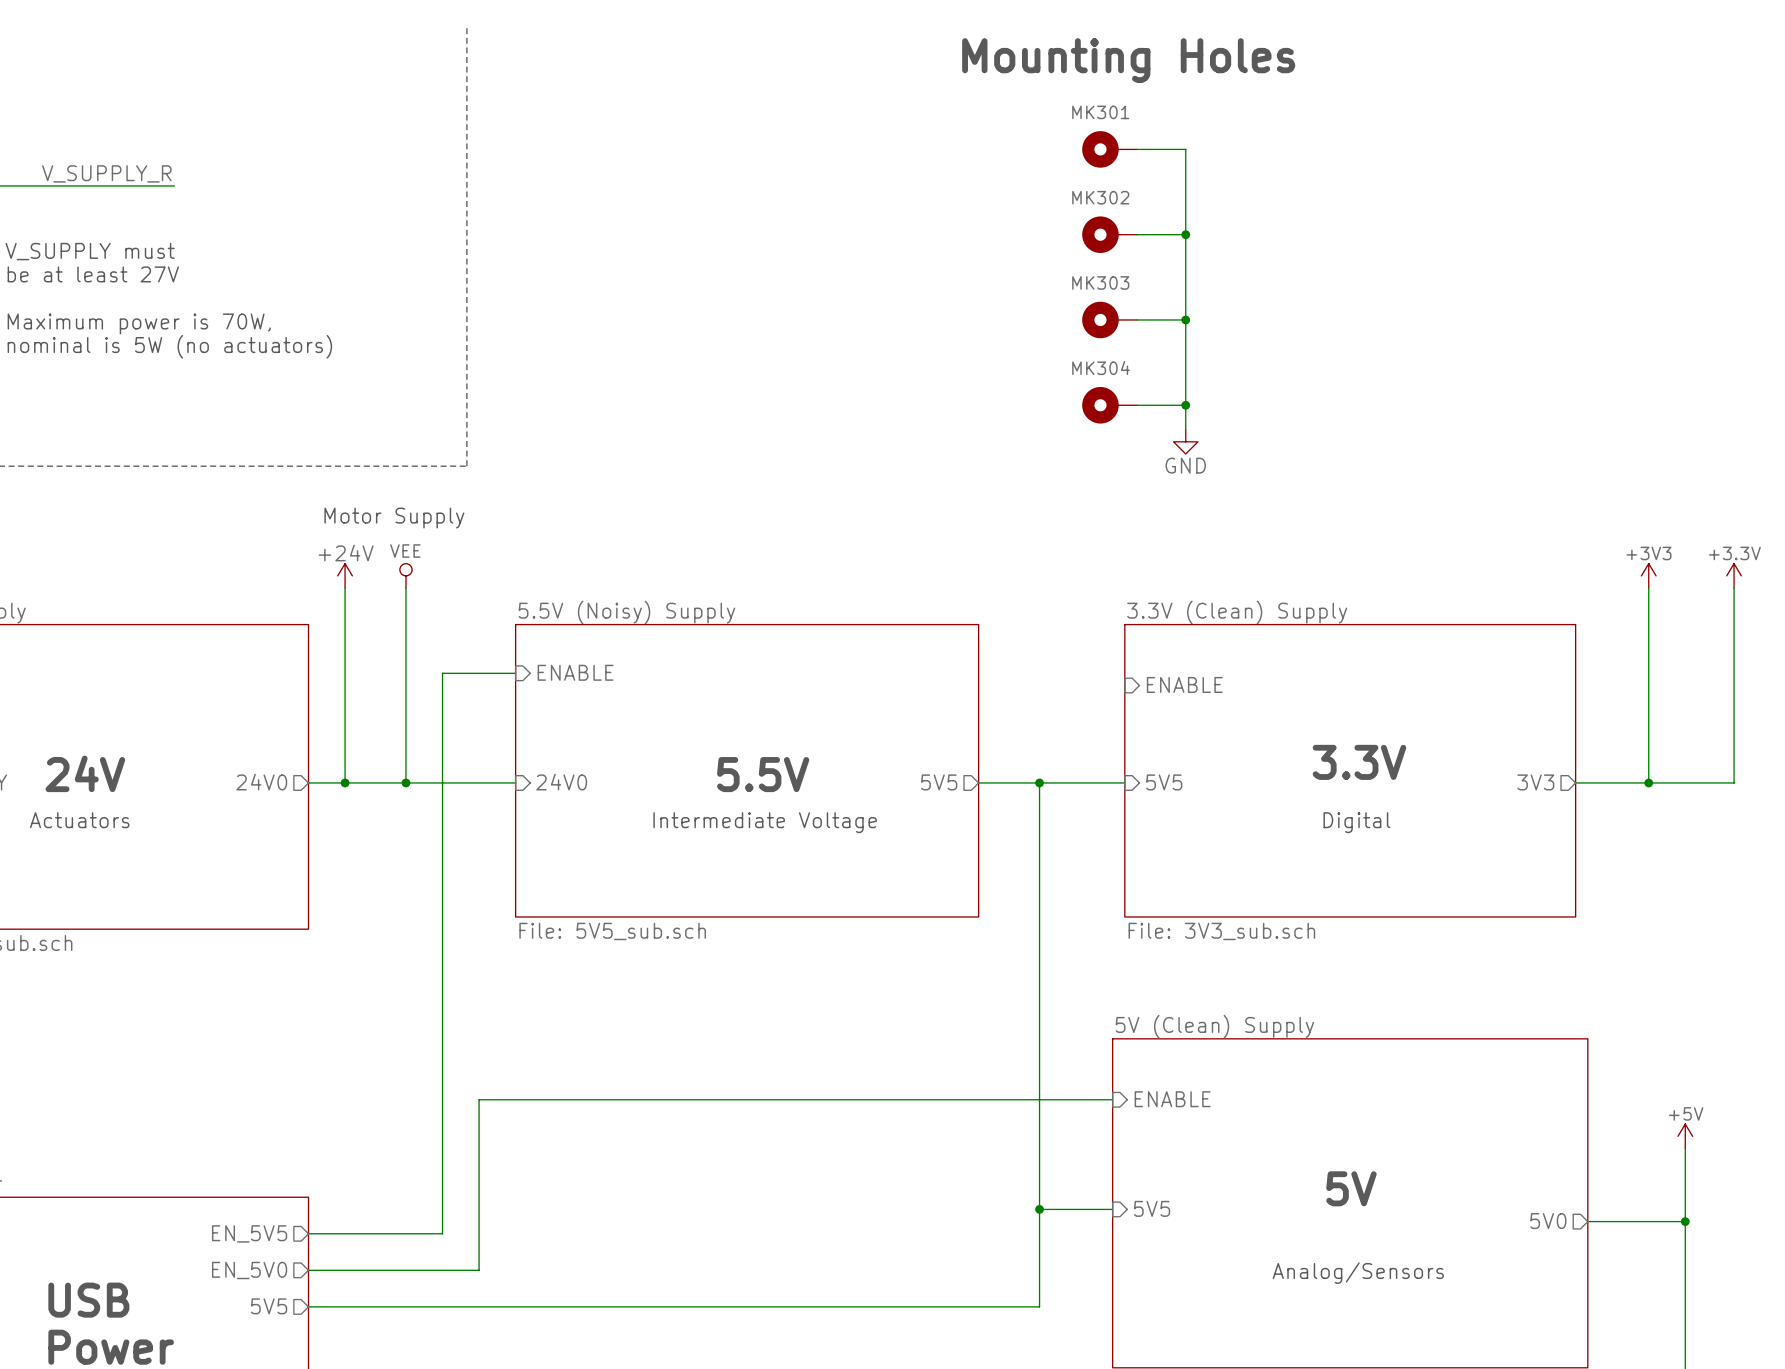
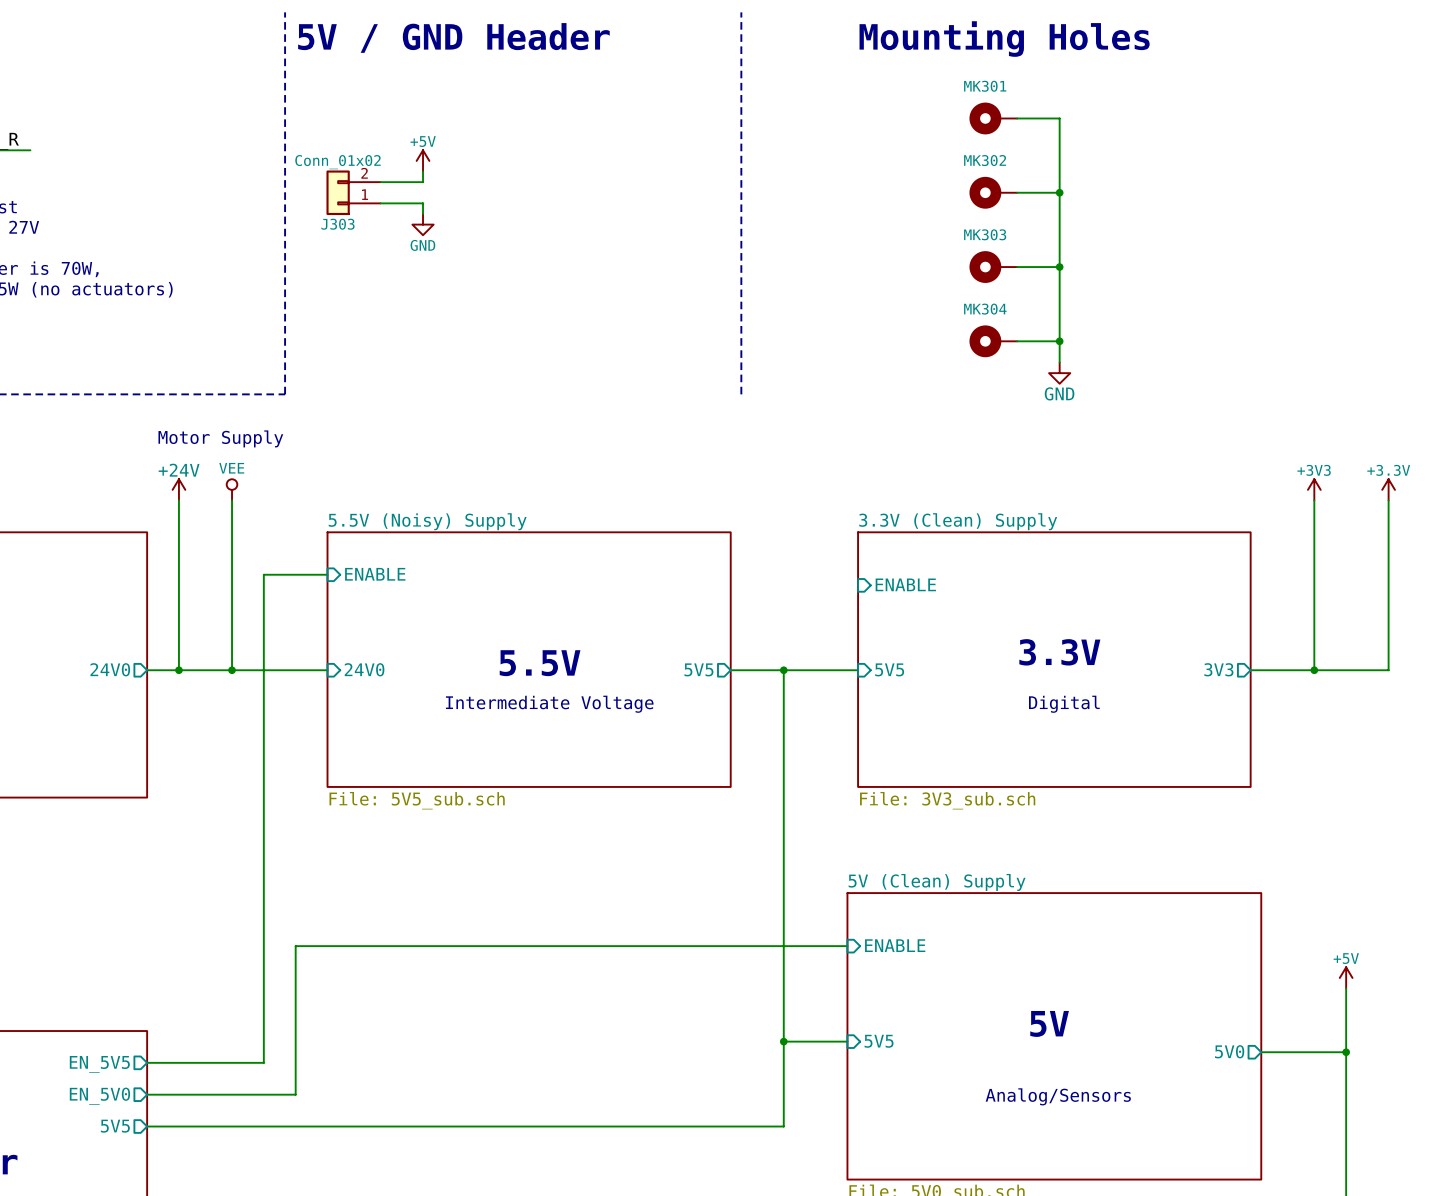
line: none -> (741, 12) (741, 394)
text: none -> 5V / GND Header (453, 37)
text position: Mounting Holes (1128, 60) -> Mounting Holes (1004, 39)
MK301 position: (1109, 149) -> (993, 118)
wire: (1137, 149) (1185, 149) (1185, 429) -> (1017, 118) (1059, 118) (1059, 362)
power symbol: none -> +5V (423, 160)
wire: none -> (423, 171) (423, 182) (380, 182)
J303: none -> Conn_01x02 (353, 192)
MK302 position: (1109, 234) -> (993, 192)
wire: (1137, 234) (1185, 234) -> (1017, 192) (1059, 192)
junction: (1185, 234) -> none
junction: none -> (1059, 192)
wire: none -> (380, 203) (423, 203) (423, 213)
power symbol: none -> GND (423, 224)
MK303 position: (1109, 319) -> (993, 267)
wire: (1137, 319) (1185, 319) -> (1017, 267) (1059, 267)
junction: (1185, 319) -> none
junction: none -> (1059, 267)
MK304 position: (1109, 405) -> (993, 341)
wire: (1137, 405) (1185, 405) -> (1017, 341) (1059, 341)
junction: (1185, 405) -> none
junction: none -> (1059, 341)
power symbol position: GND (1185, 441) -> GND (1059, 373)

